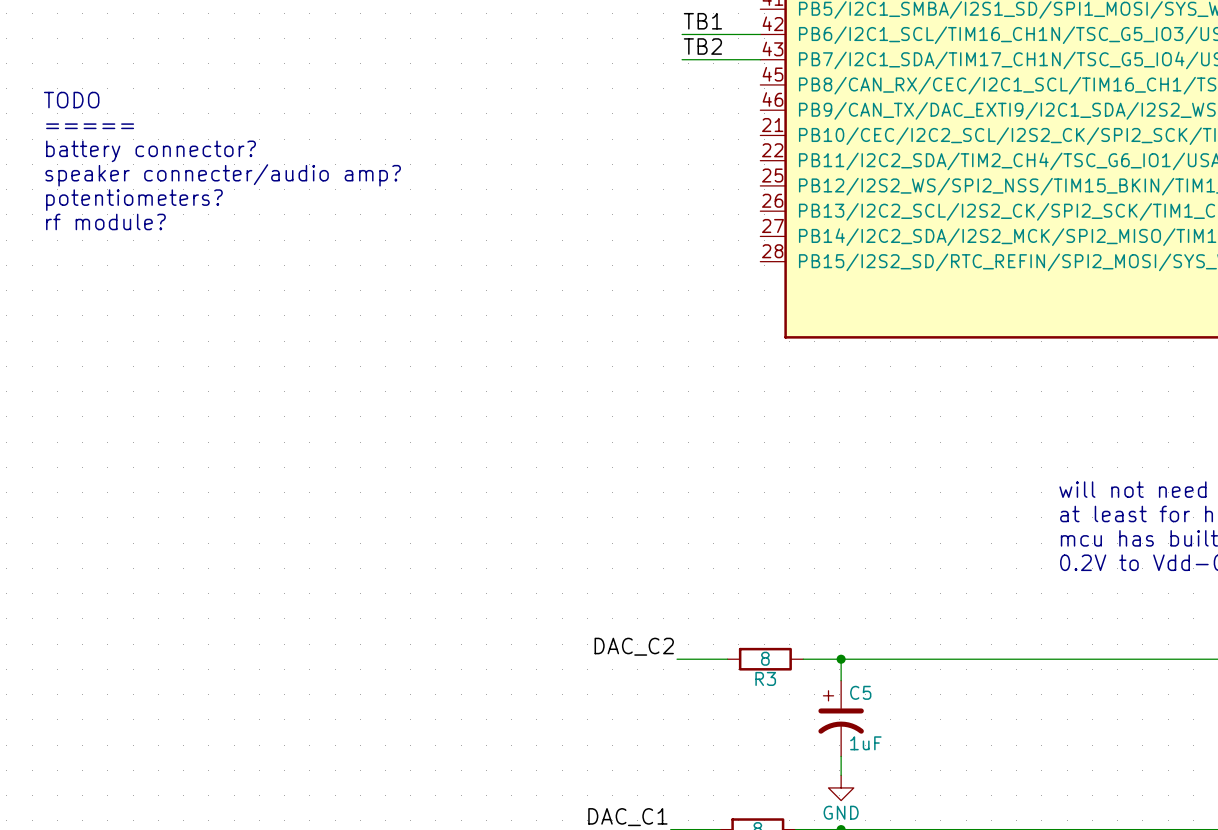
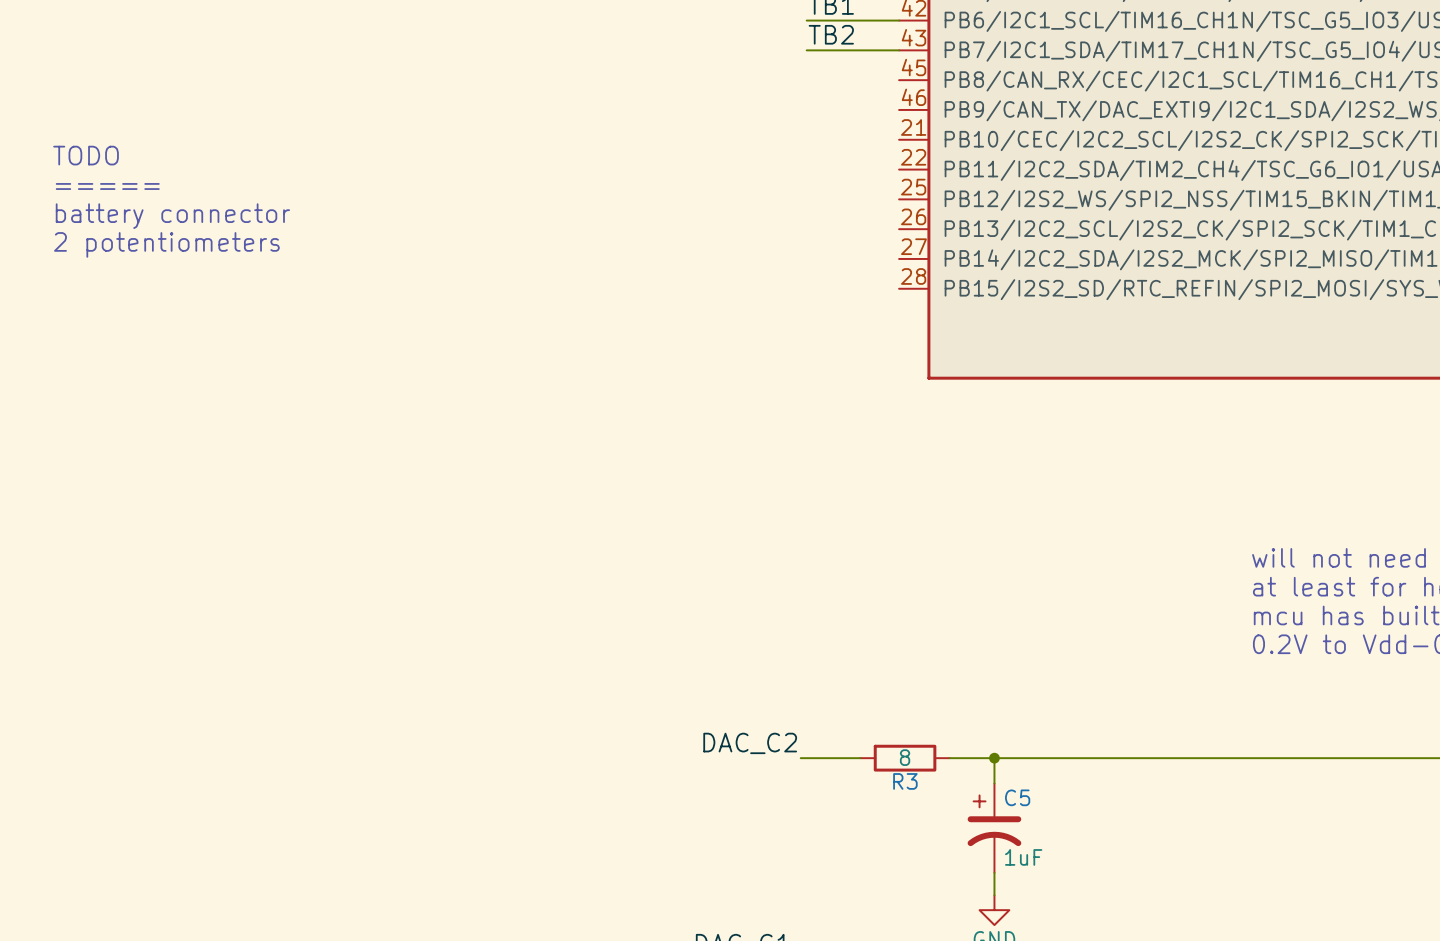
text: TODO (71, 100) -> none
text: ===== (90, 126) -> none
text: battery connector? (151, 151) -> TODO (86, 155)
text: speaker connecter/audio amp? (223, 175) -> ===== (107, 186)
text: potentiometers? (134, 200) -> battery connector (172, 216)
text: rf module? (105, 221) -> 2 potentiometers (166, 244)

